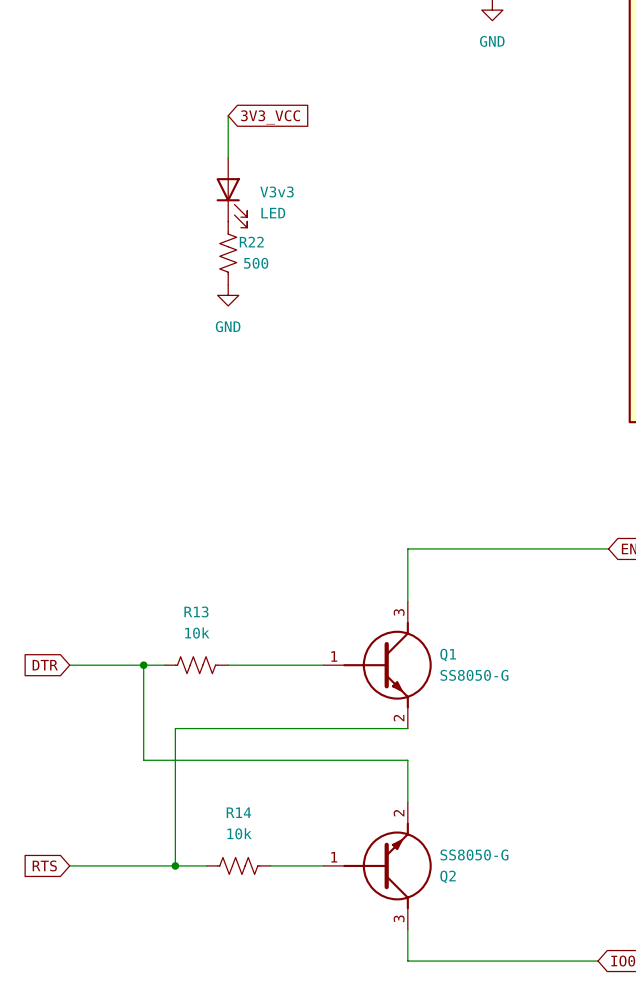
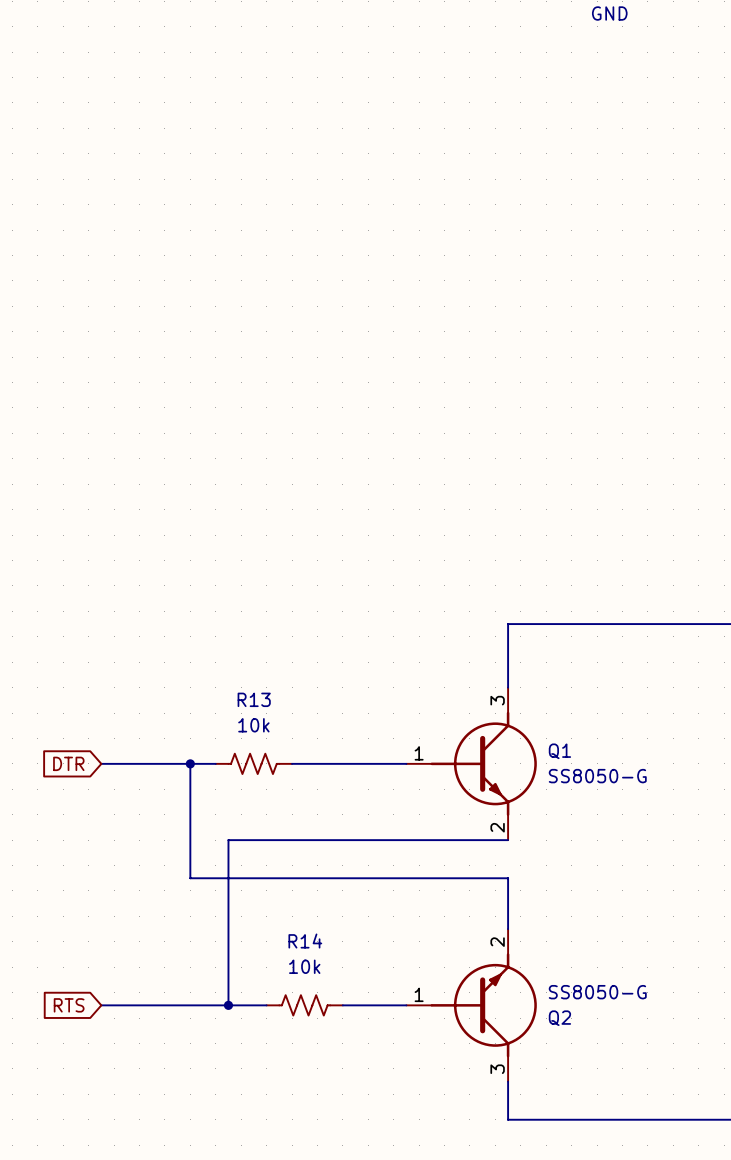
wire: (228, 115) (228, 158) -> none
global label: 3V3_VCC (270, 117) -> none
V3v3: LED (231, 192) -> none
R22: 500 (228, 253) -> none
power symbol: GND (228, 295) -> none

